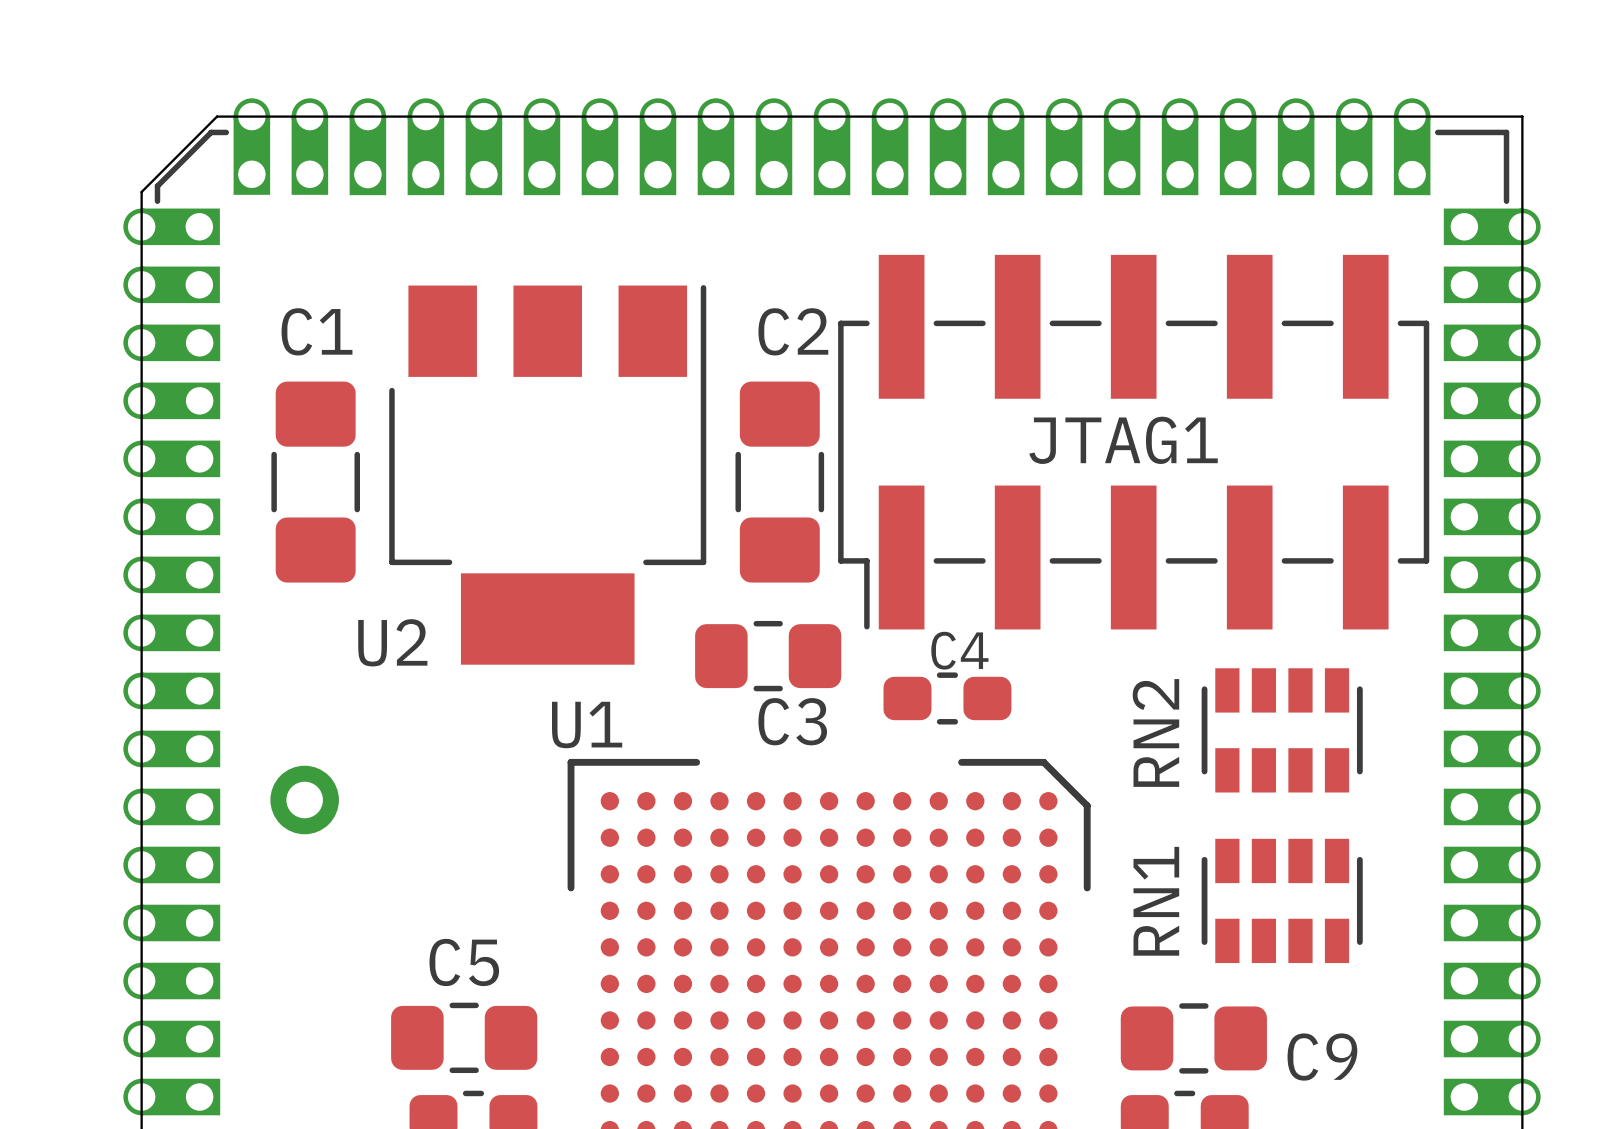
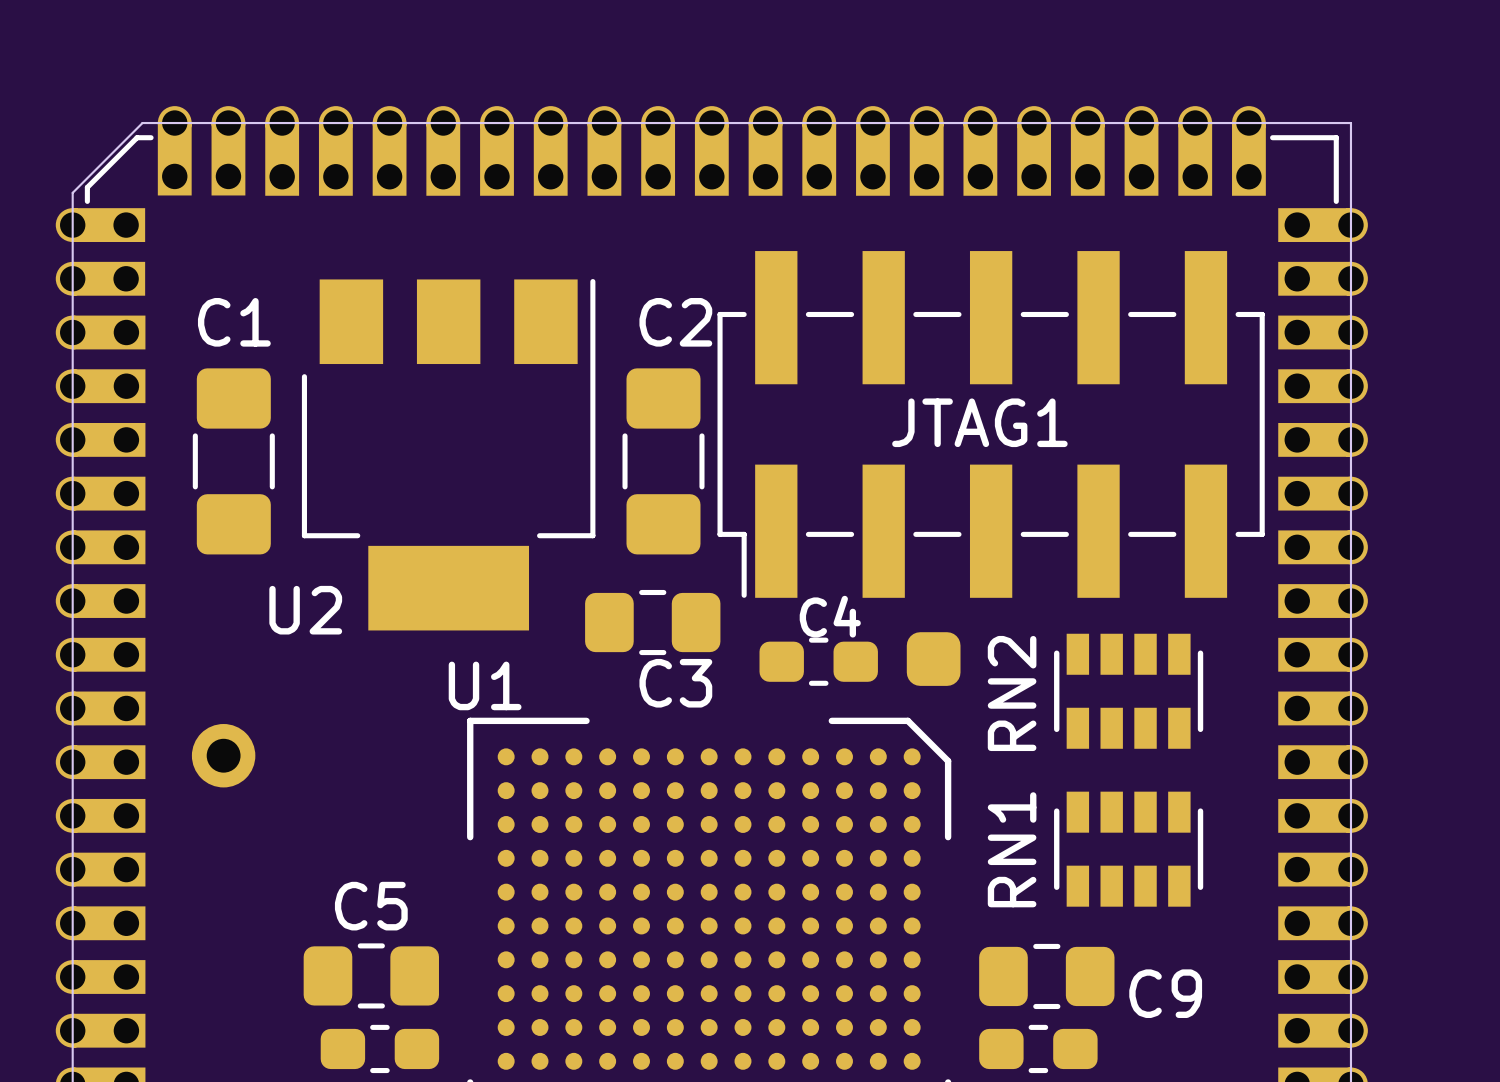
part: none -> (933, 659)

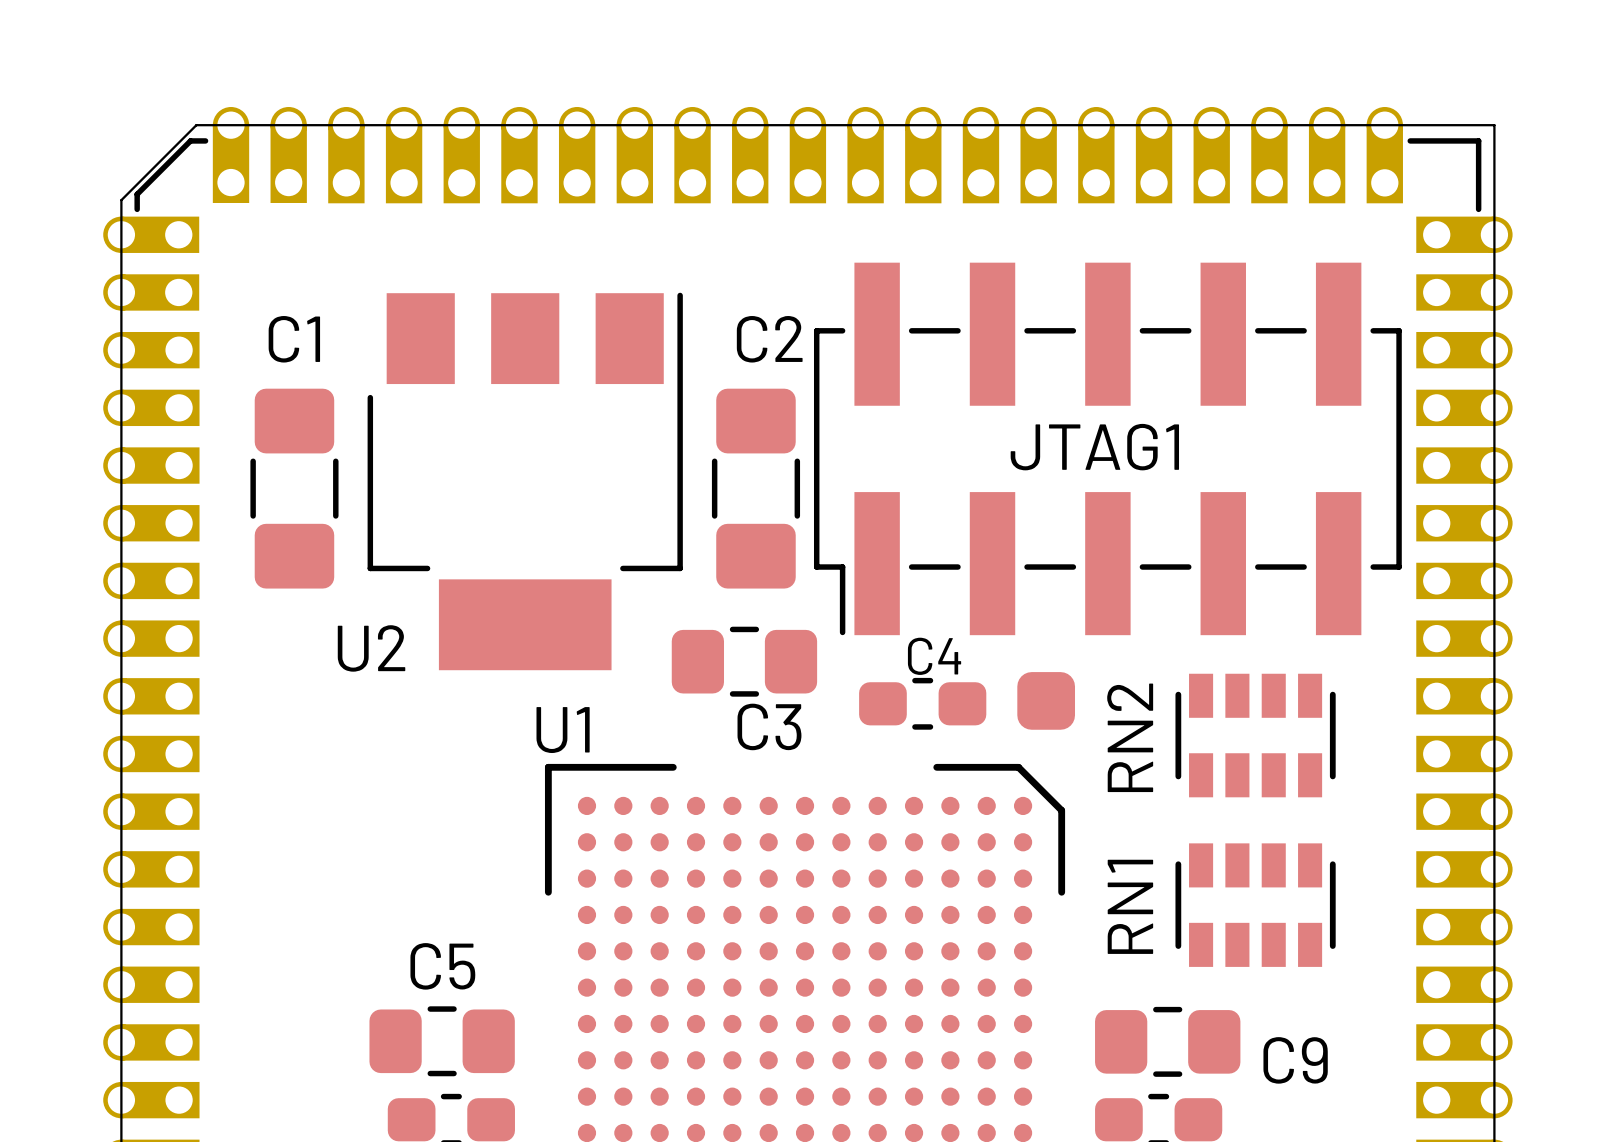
part: (223, 755) -> none

